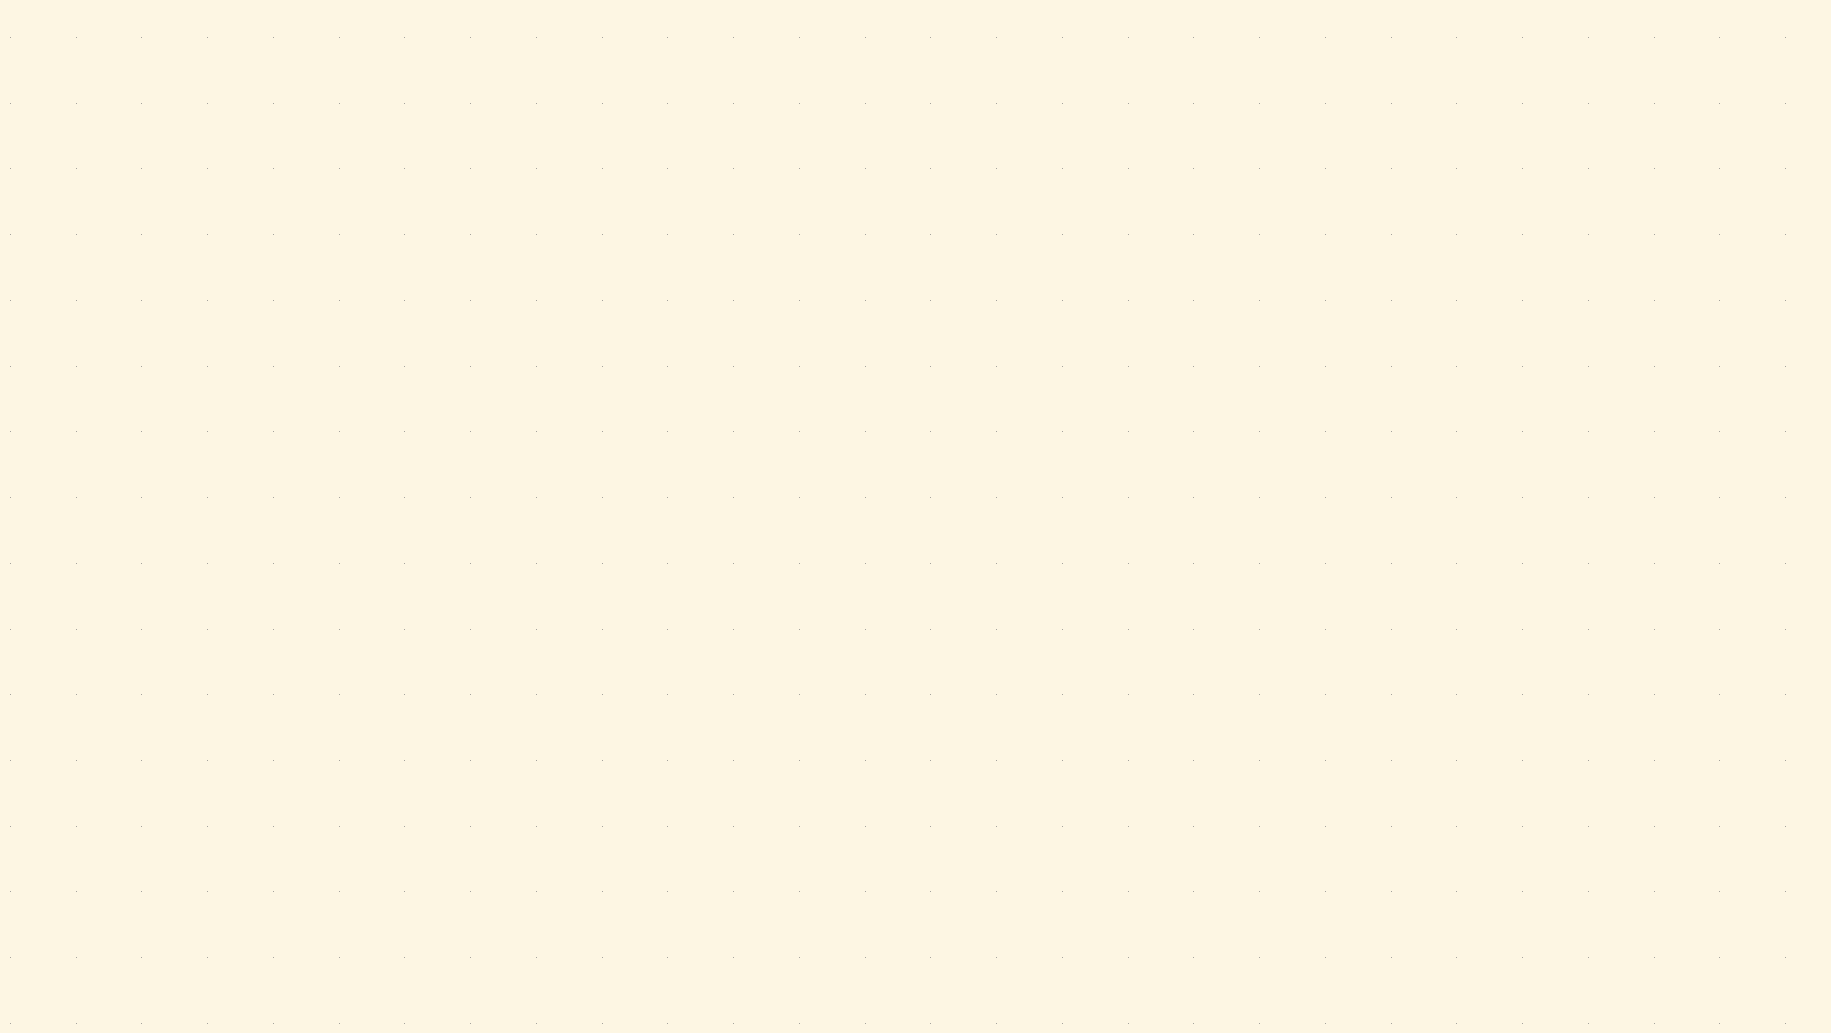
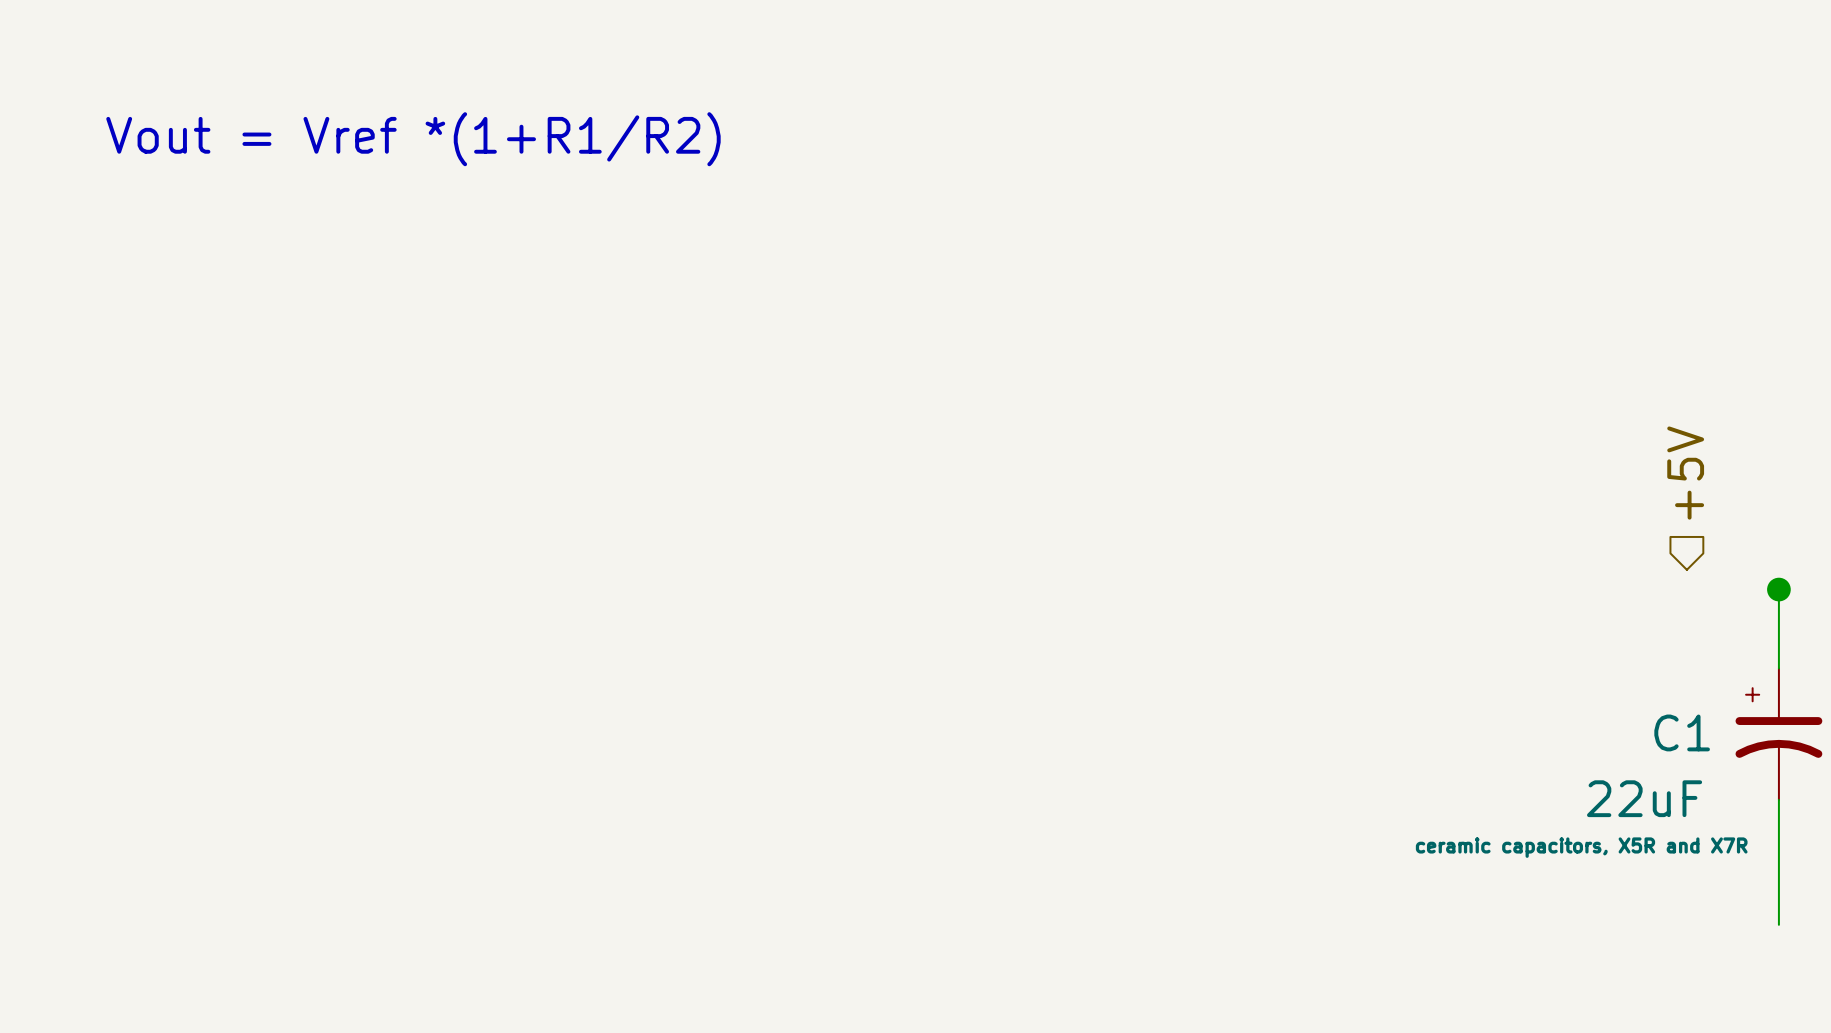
text: none -> Vout = Vref *(1+R1/R2) (413, 139)
hierarchical label: none -> +5V (1685, 473)
wire: none -> (1778, 589) (1778, 668)
junction: none -> (1778, 589)
C1: none -> 22uF (1778, 734)
wire: none -> (1778, 799) (1778, 924)

